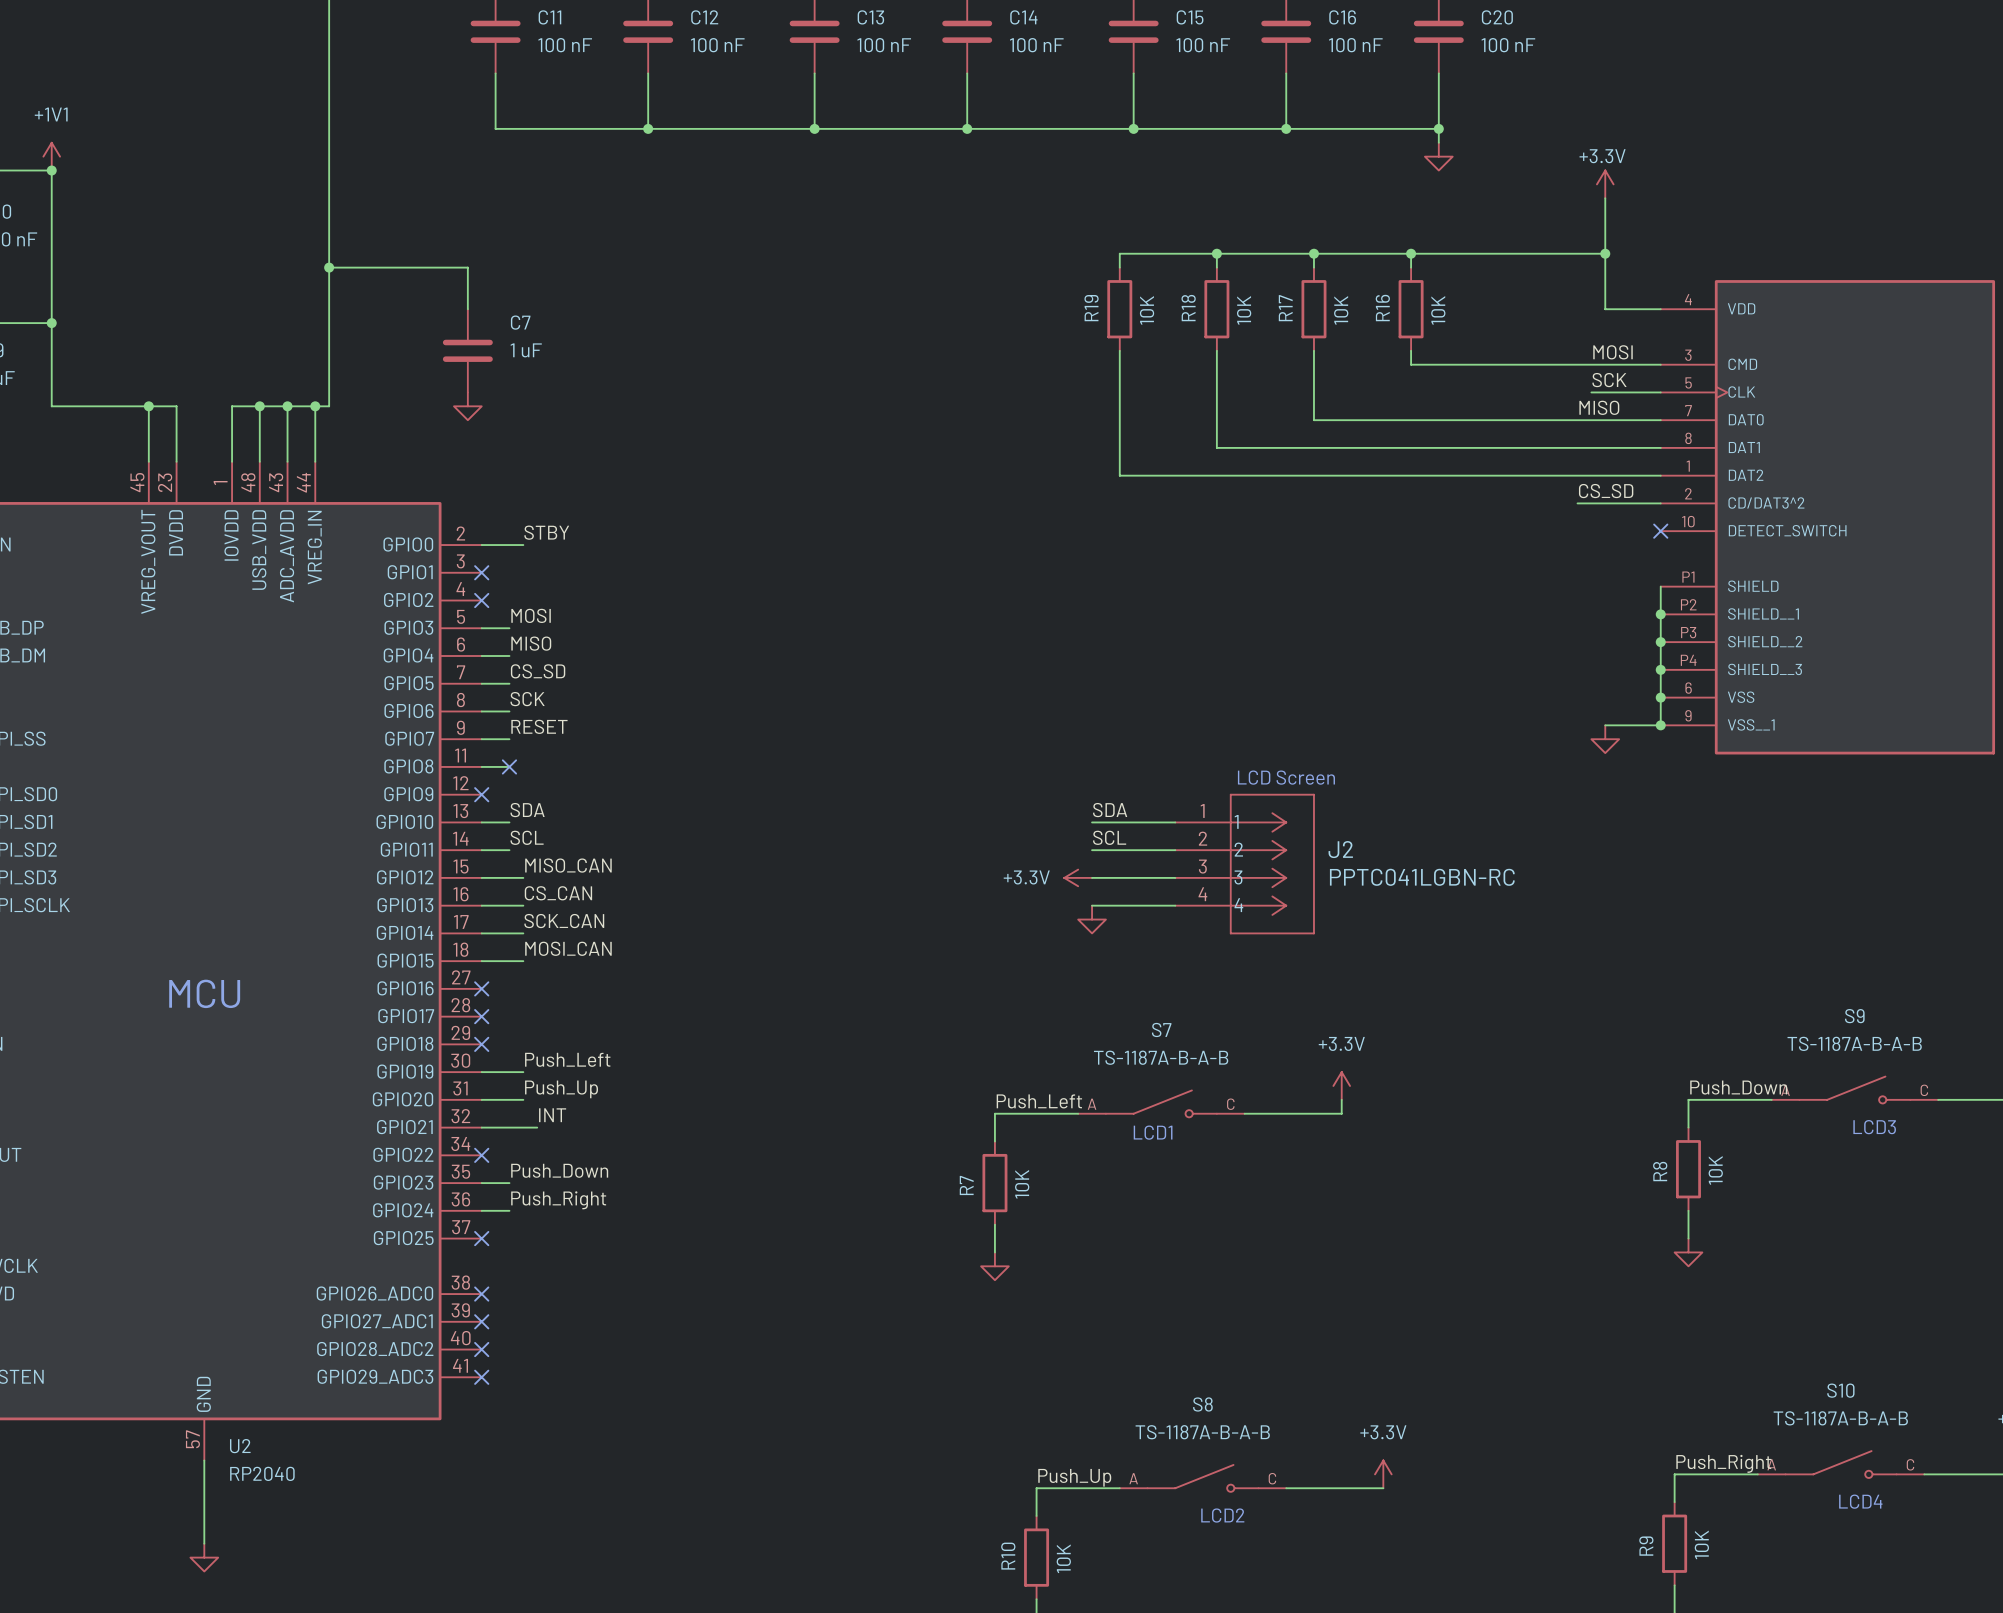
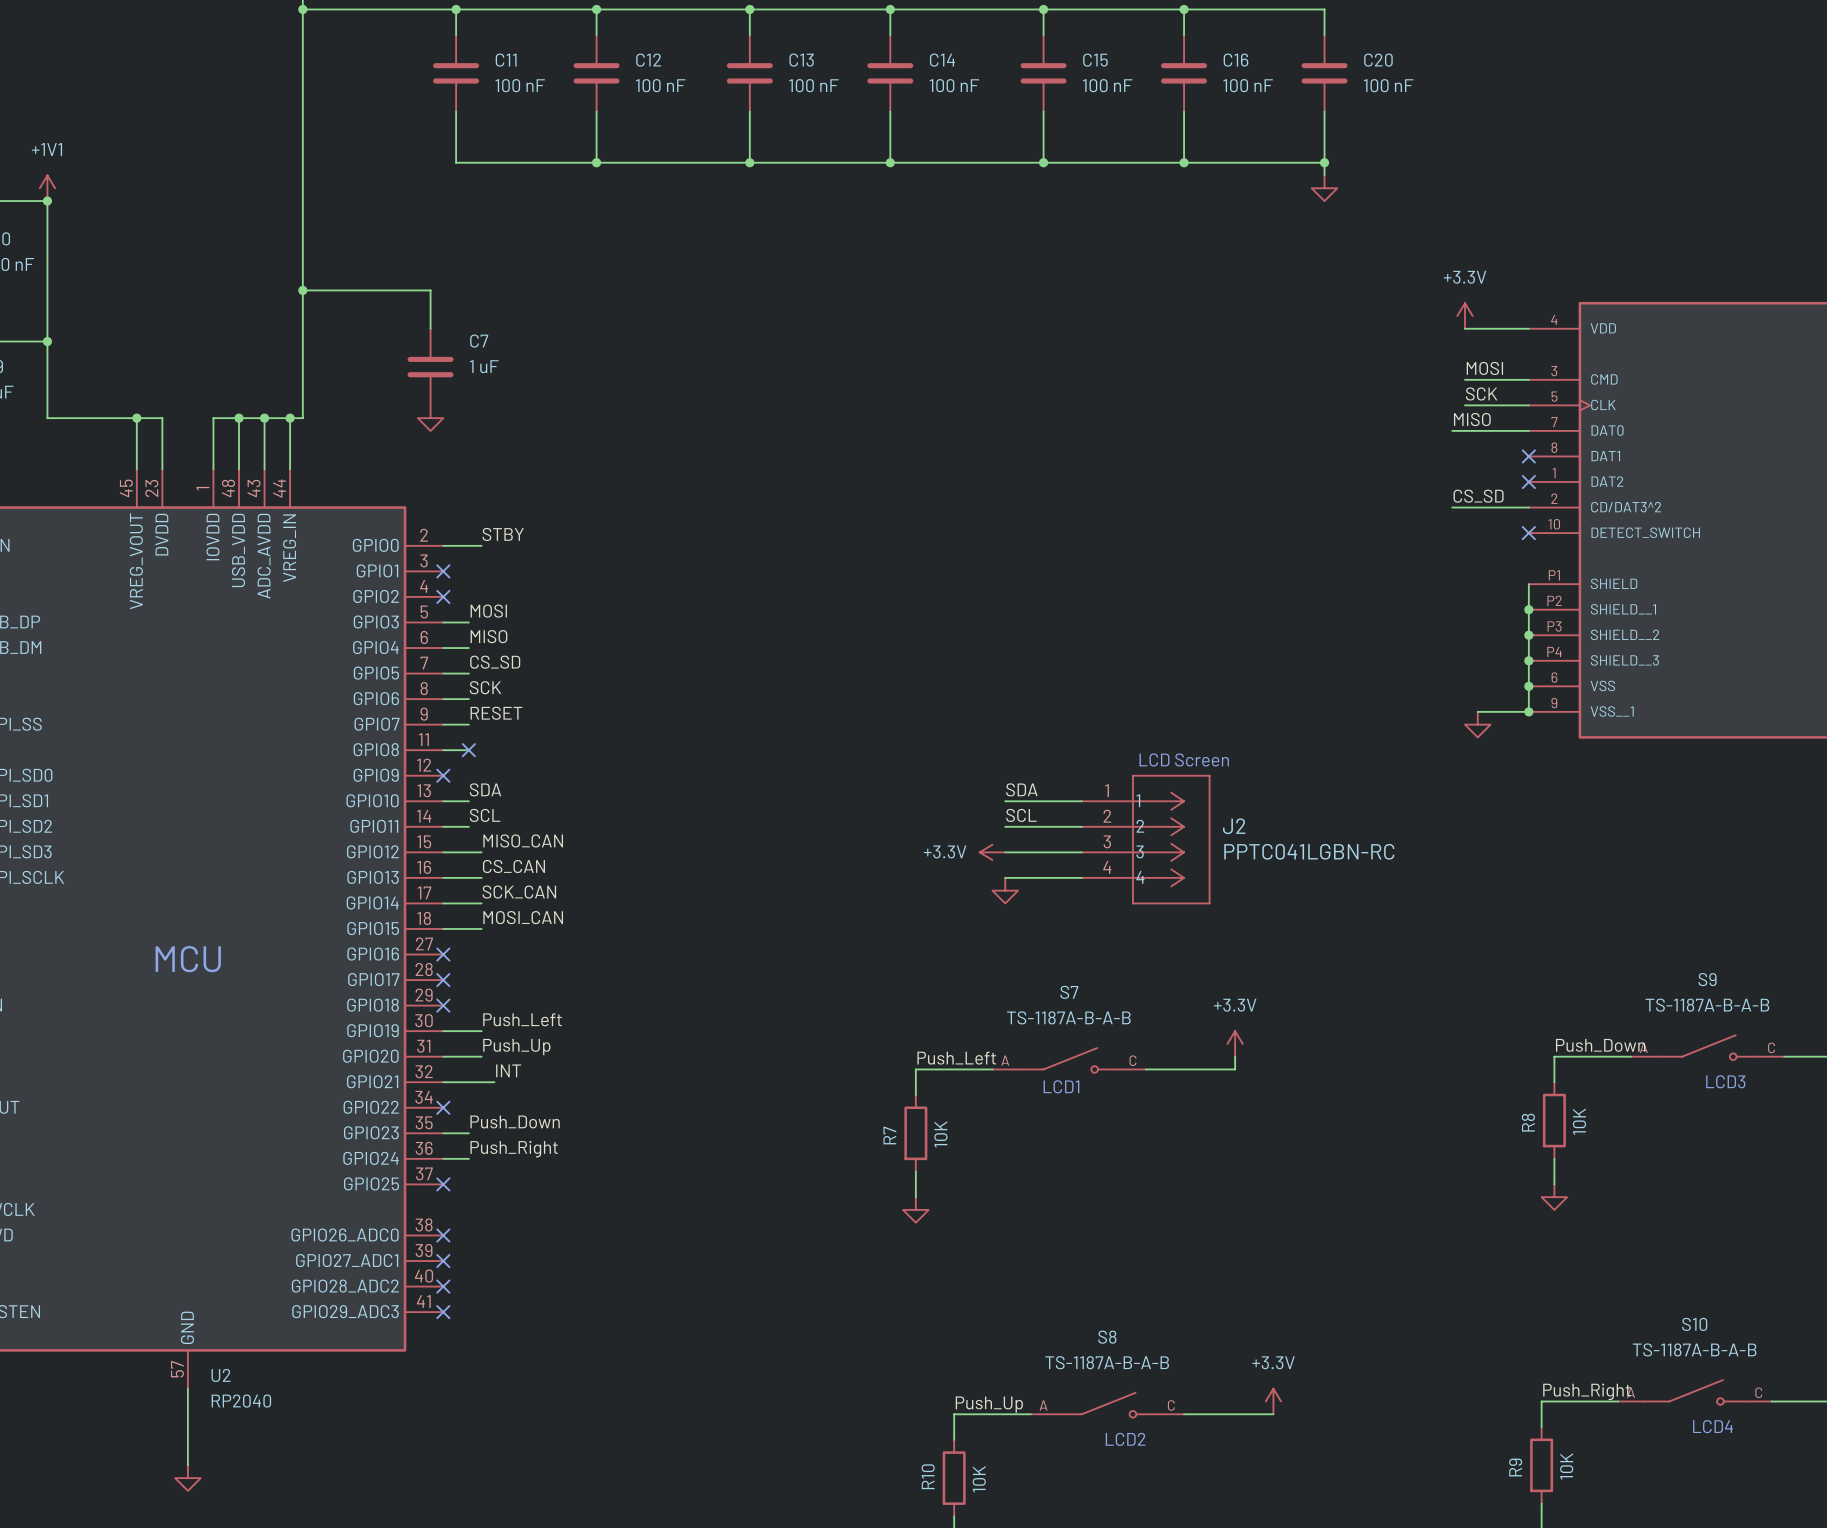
power symbol text position: +3.3V (1602, 156) -> +3.3V (1465, 277)
power symbol position: +3.3V (1605, 184) -> +3.3V (1465, 315)
wire: (1605, 198) (1605, 309) -> (1465, 328) (1477, 328)
wire: (1216, 253) (1216, 267) -> none
junction: (1216, 253) -> none
wire: (1313, 253) (1313, 267) -> none
junction: (1313, 253) -> none
wire: (1411, 253) (1411, 267) -> none
junction: (1411, 253) -> none
wire: (1605, 253) (1119, 253) (1119, 267) -> none
junction: (1605, 253) -> none
R19: 10K (1119, 309) -> none
R18: 10K (1216, 309) -> none
R17: 10K (1313, 309) -> none
R16: 10K (1411, 309) -> none
wire: (1119, 350) (1119, 475) (1660, 475) -> none
wire: (1216, 350) (1216, 447) (1660, 447) -> none
wire: (1313, 350) (1313, 420) (1577, 420) -> none
wire: (1411, 350) (1411, 364) (1591, 364) -> none
no-connect mark: none -> (1528, 456)
no-connect mark: none -> (1528, 482)

